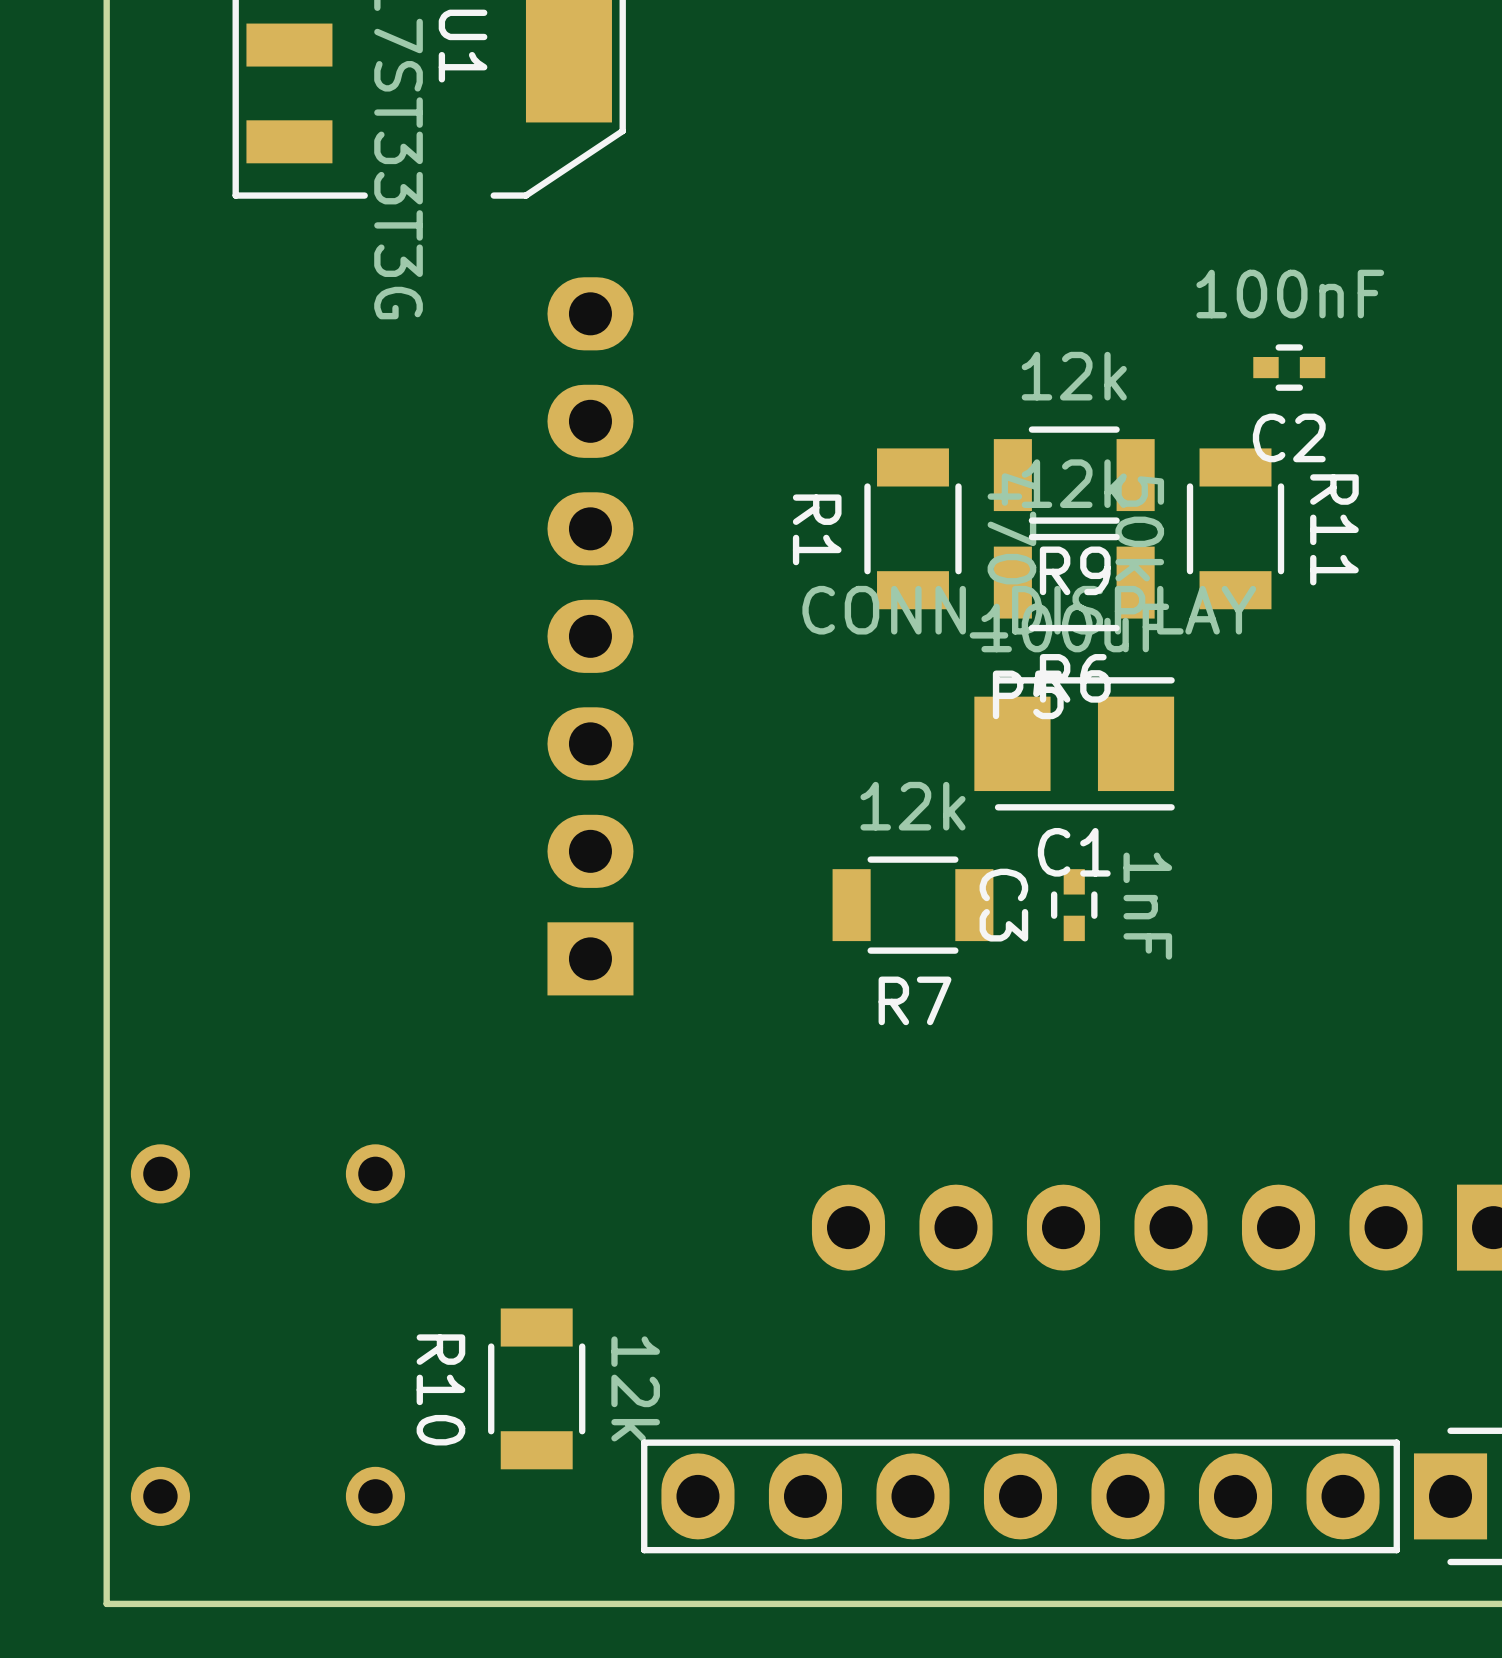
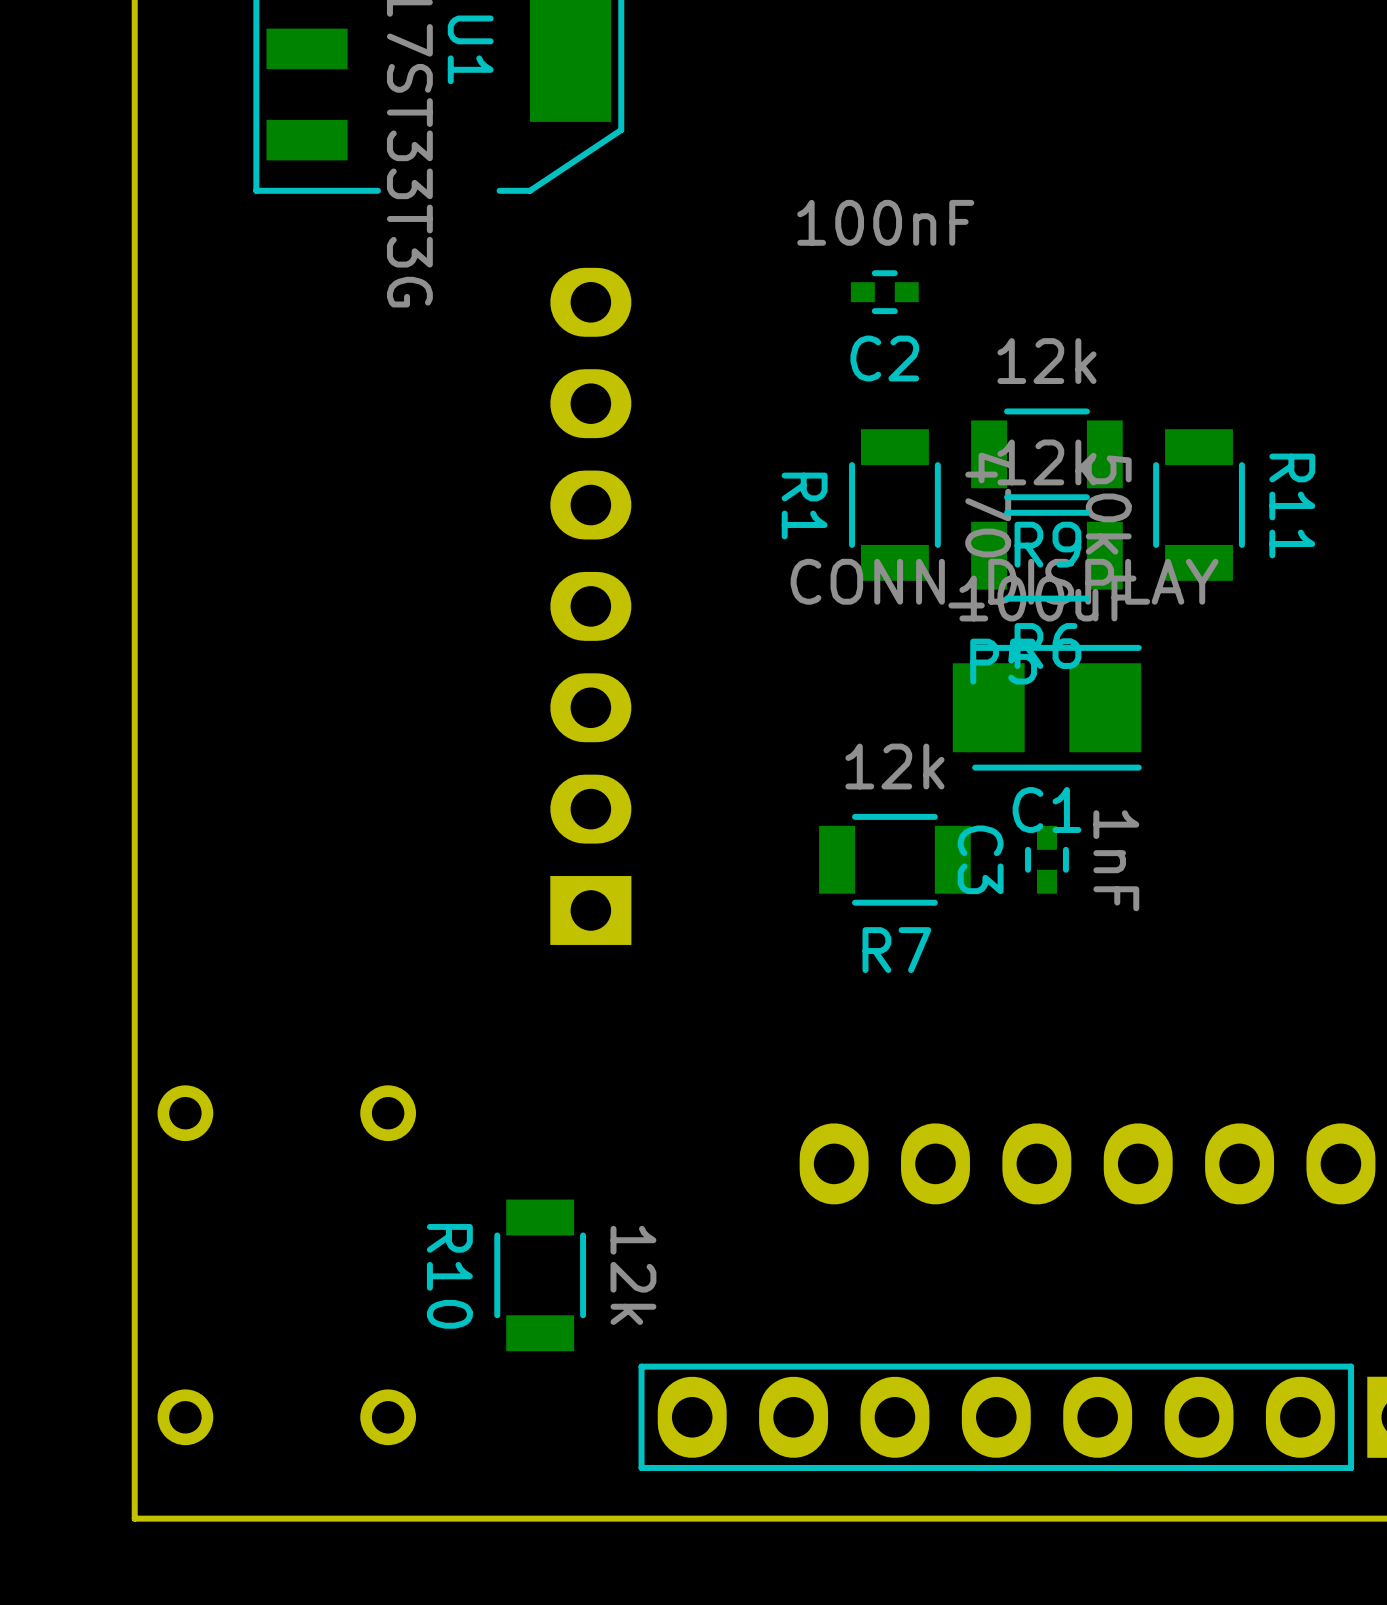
C2 position: (1289, 367) -> (884, 292)
R10 position: (536, 1388) -> (540, 1275)

